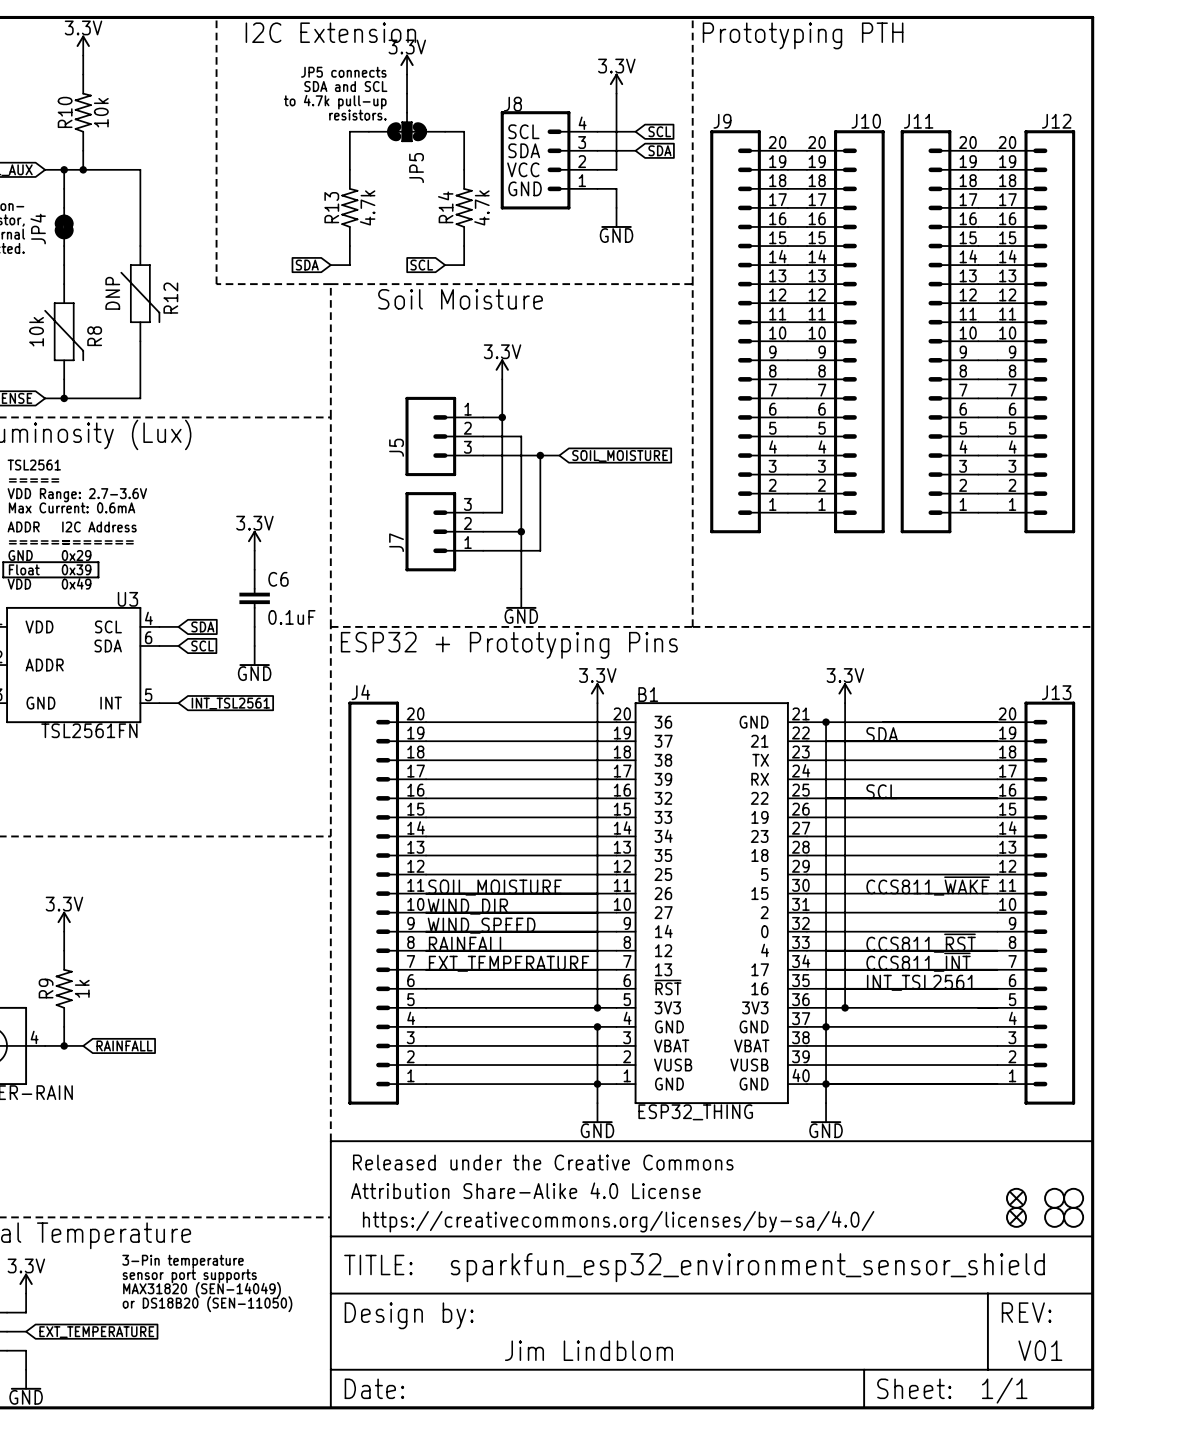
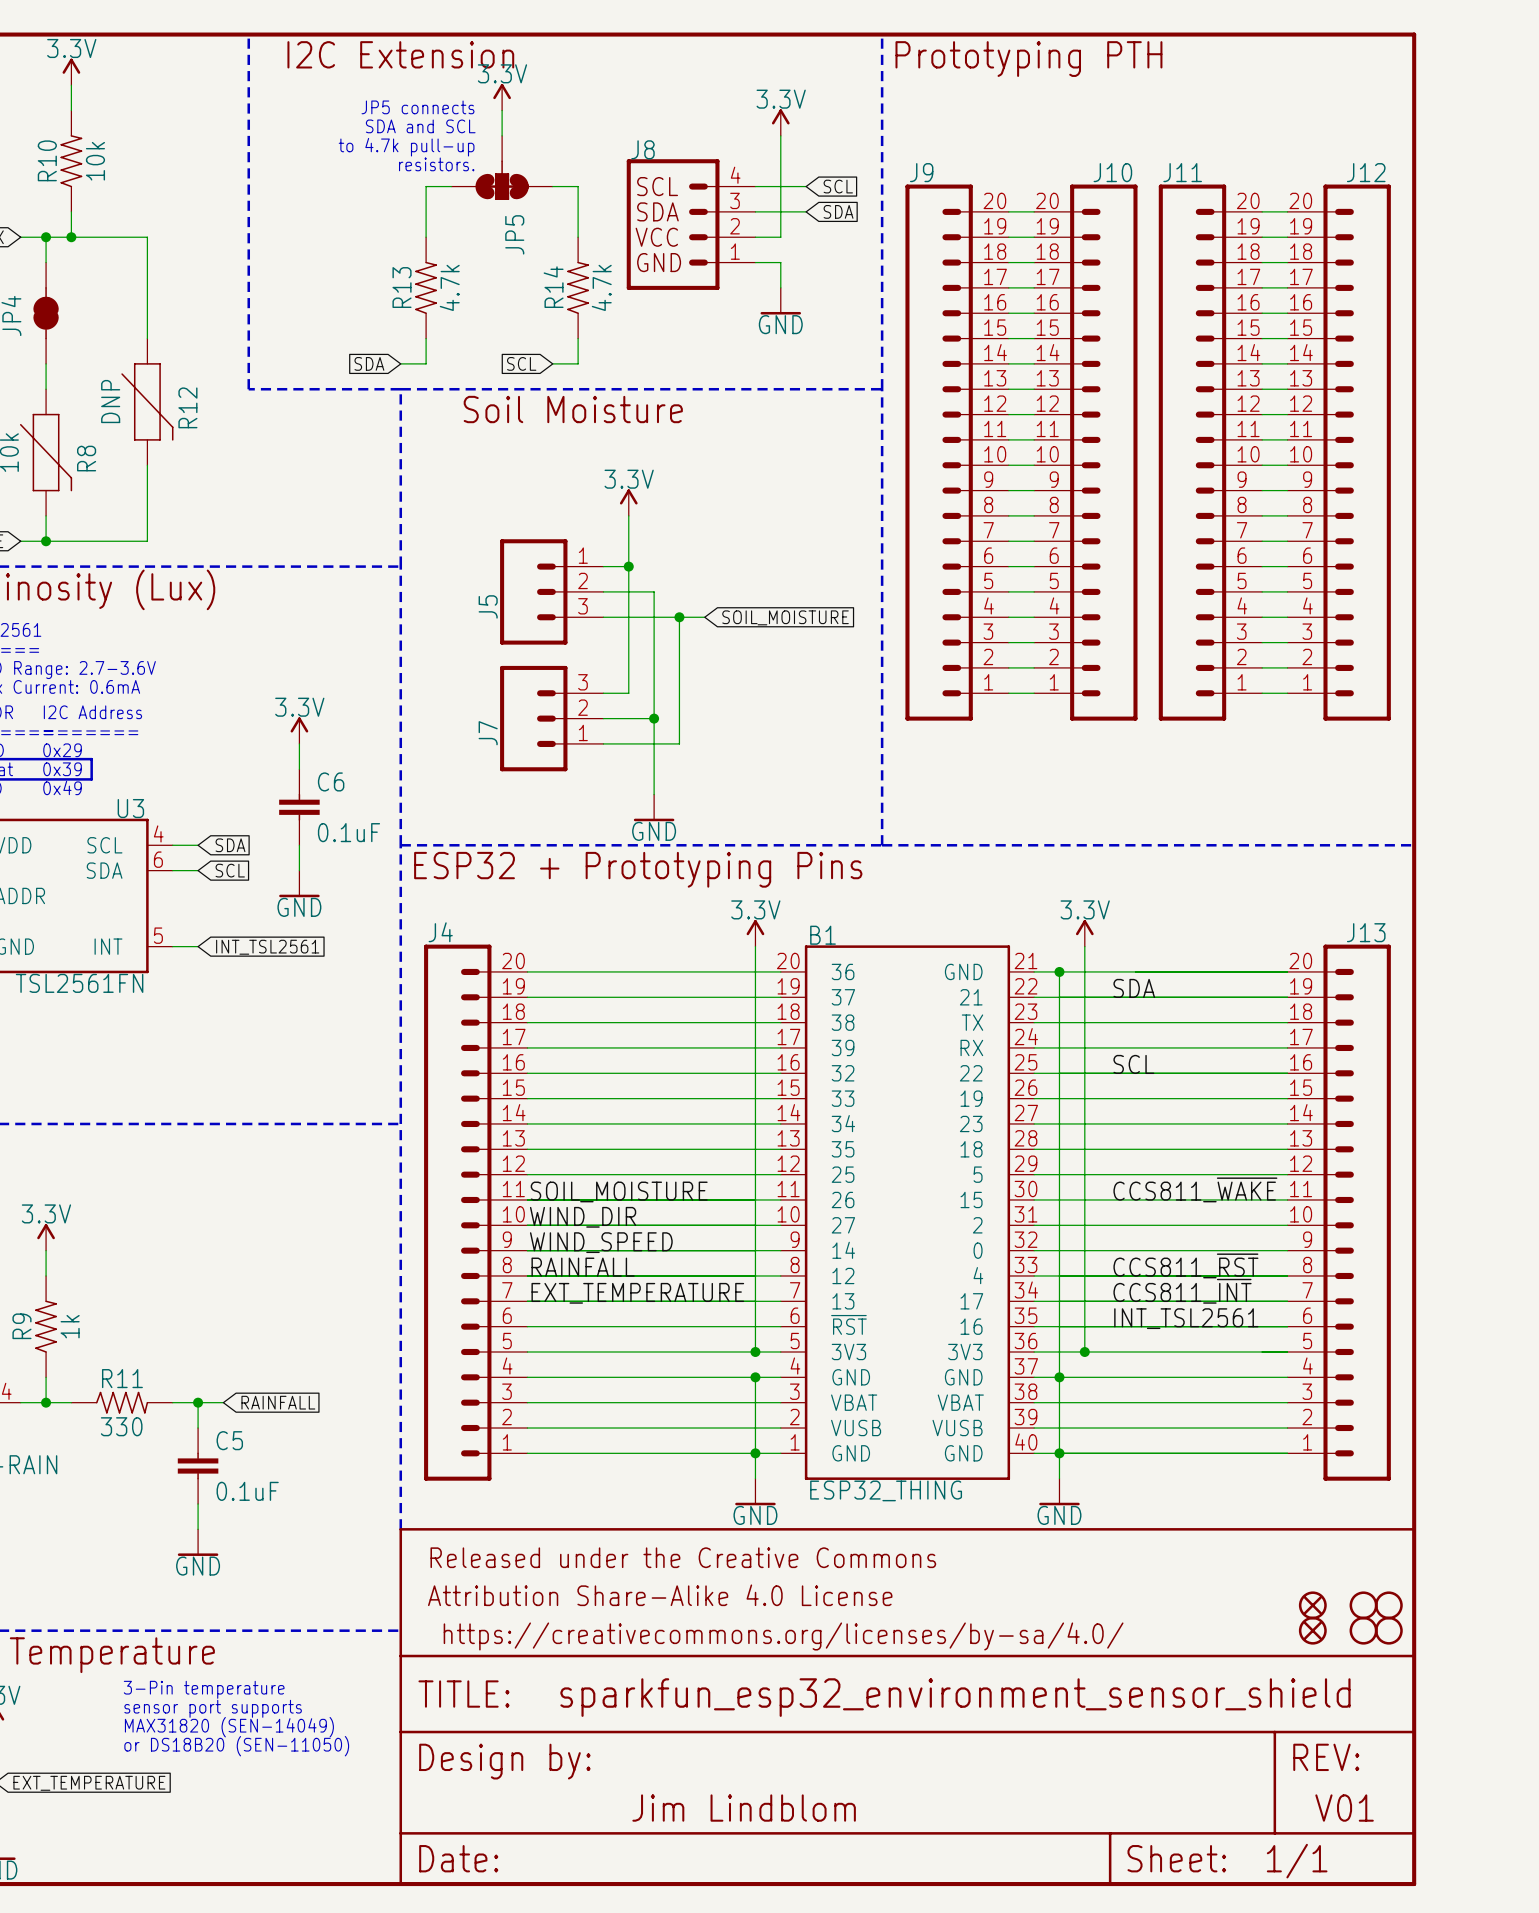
R11: none -> 330 (122, 1402)
global label position: RAINFALL (124, 1045) -> RAINFALL (278, 1402)
wire: none -> (172, 1402) (223, 1402)
wire: none -> (198, 1402) (198, 1428)
junction: none -> (198, 1402)
C5: none -> 0.1uF (198, 1466)
wire: none -> (198, 1504) (198, 1529)
power symbol: none -> GND (198, 1542)

